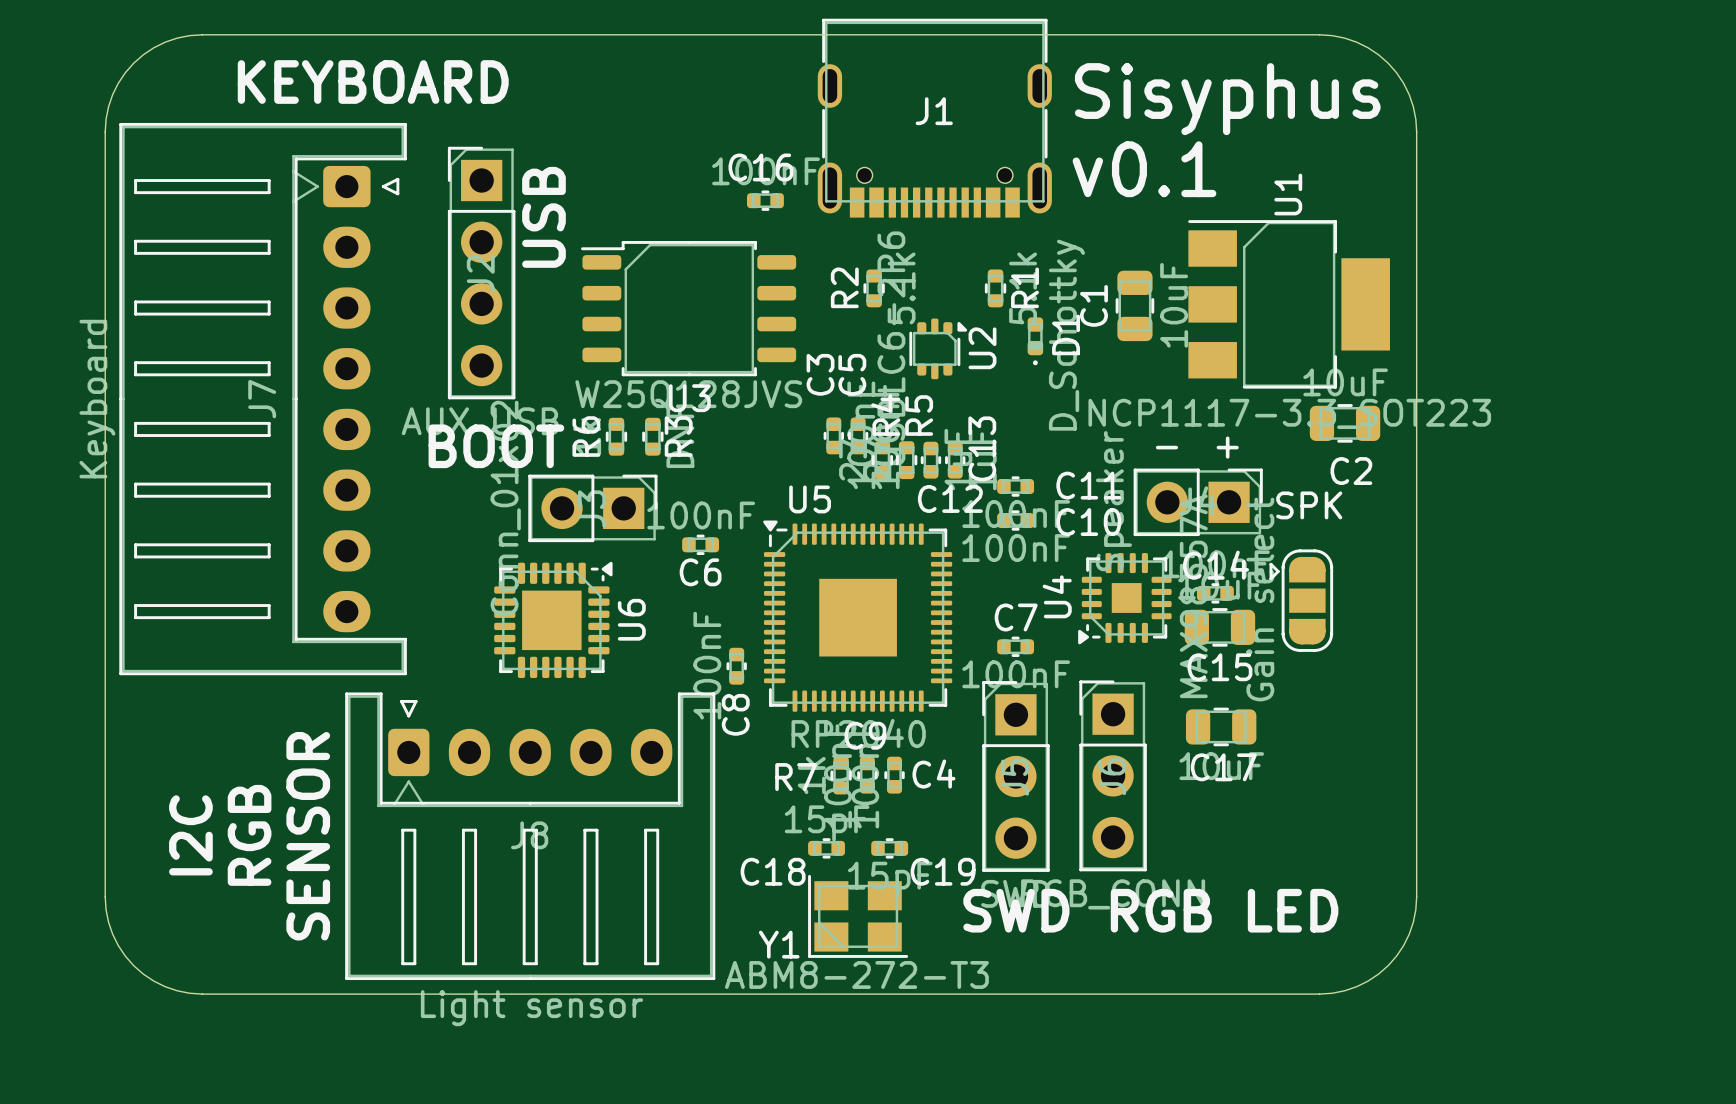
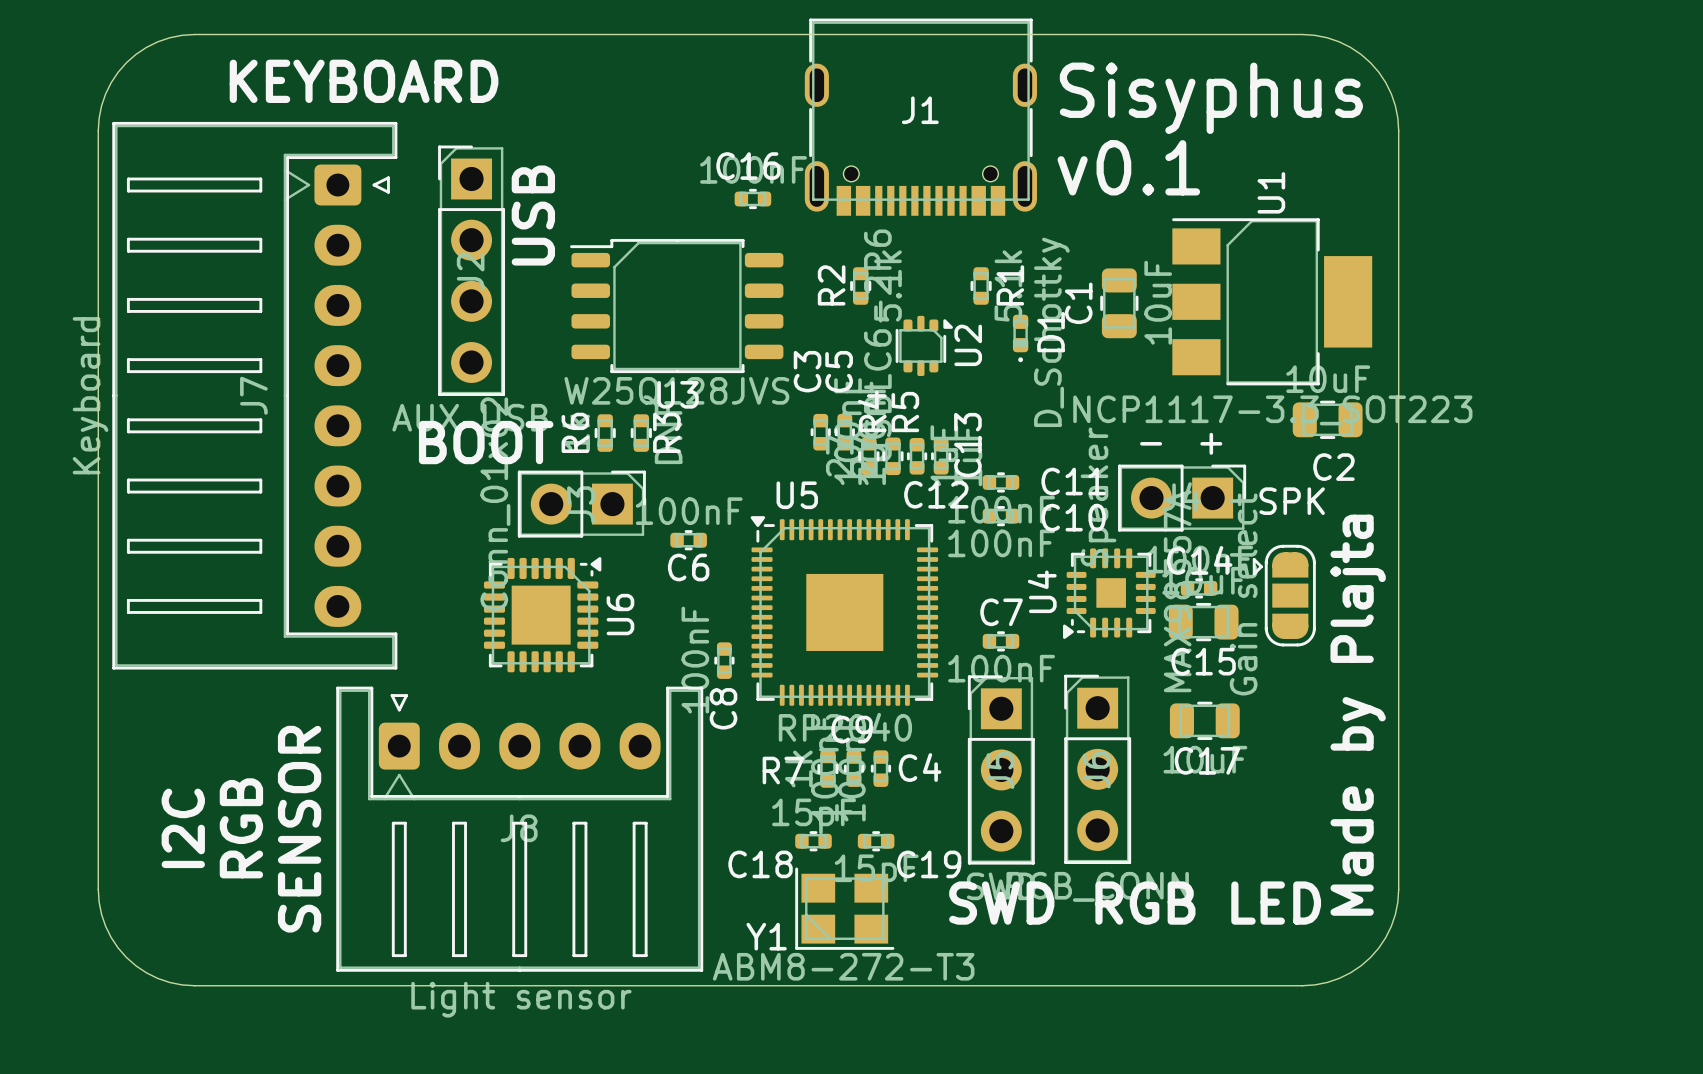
text: none -> Made by Plajta (1358, 715)

